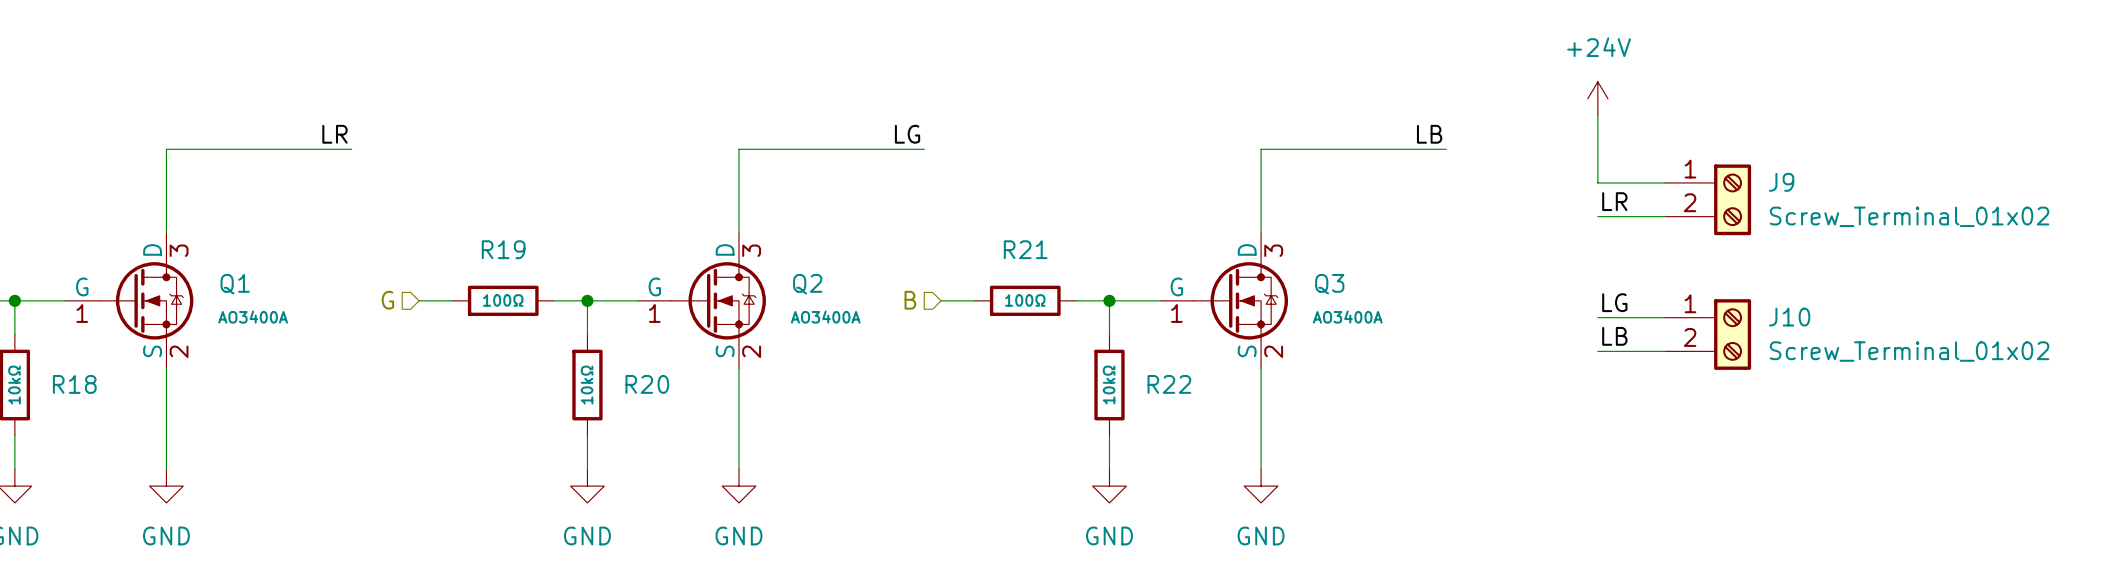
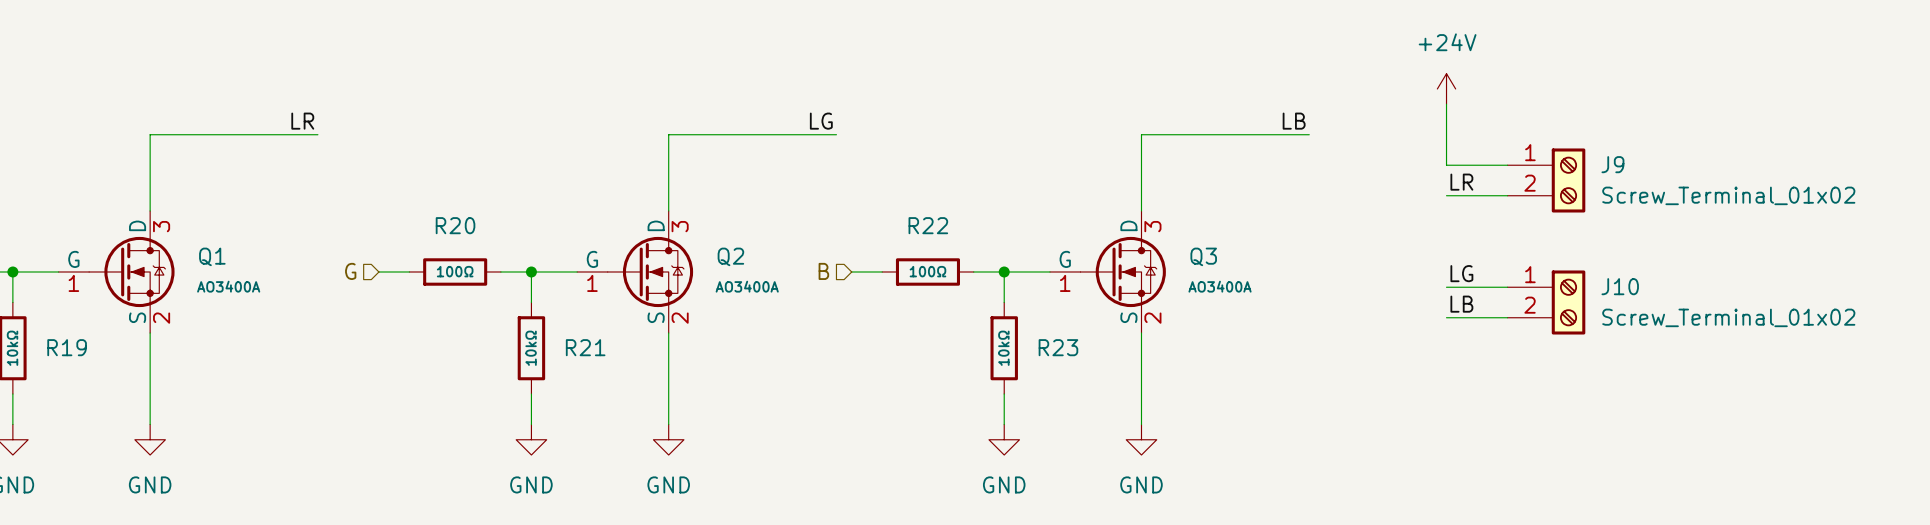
R19 name: R19 (503, 249) -> R20 (455, 225)
R21 name: R21 (1025, 249) -> R22 (928, 225)
R18 name: R18 (74, 384) -> R19 (67, 347)
R20 name: R20 (647, 384) -> R21 (585, 347)
R22 name: R22 (1169, 384) -> R23 (1058, 347)

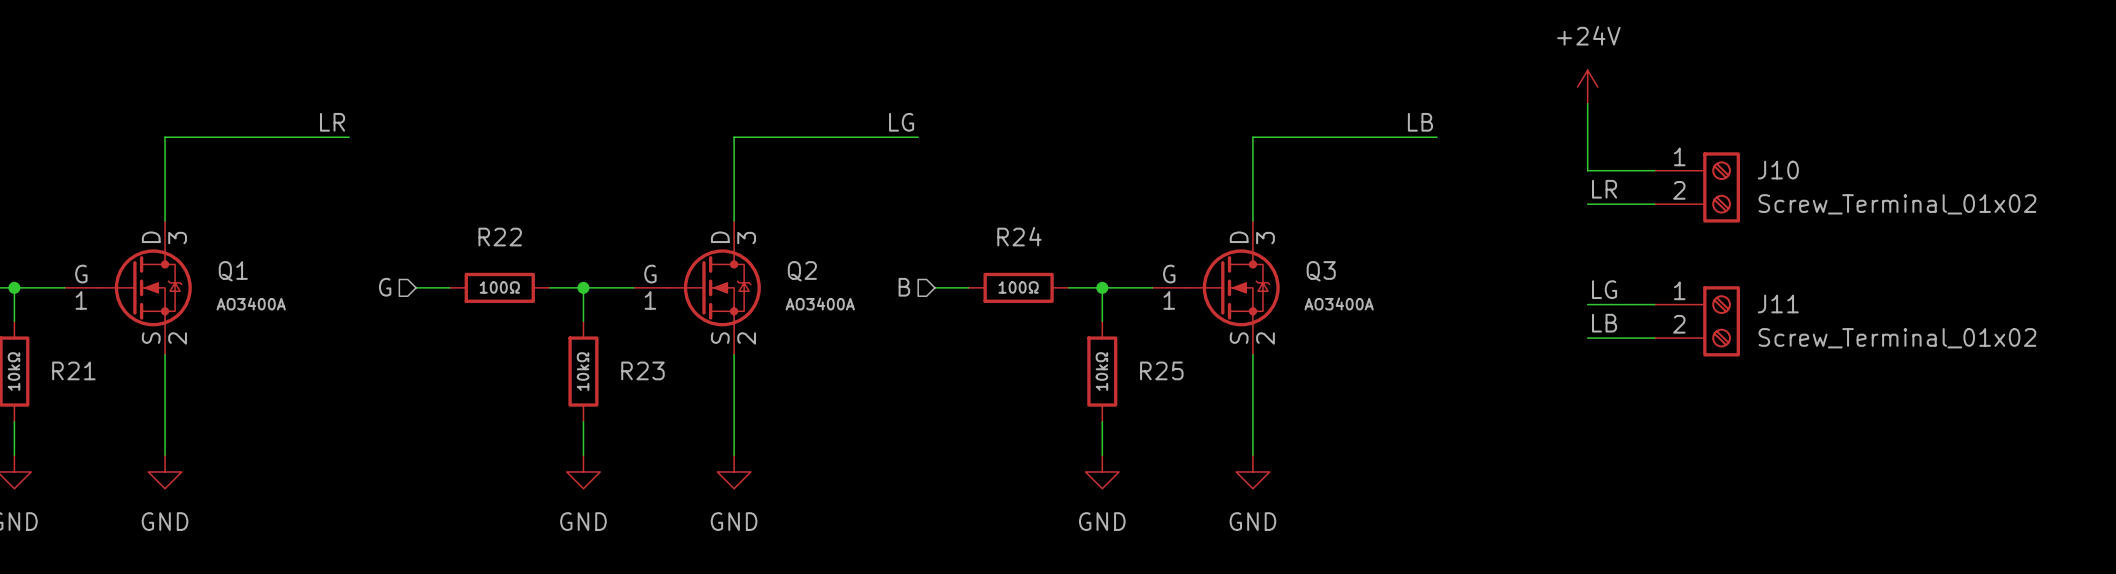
J9 name: J9 (1612, 164) -> J10 (1778, 170)
R20 name: R20 (455, 225) -> R22 (500, 237)
R22 name: R22 (928, 225) -> R24 (1019, 236)
J10 name: J10 (1620, 286) -> J11 (1778, 303)
R19 name: R19 (67, 347) -> R21 (73, 370)
R21 name: R21 (585, 347) -> R23 (642, 370)
R23 name: R23 (1058, 347) -> R25 (1161, 370)

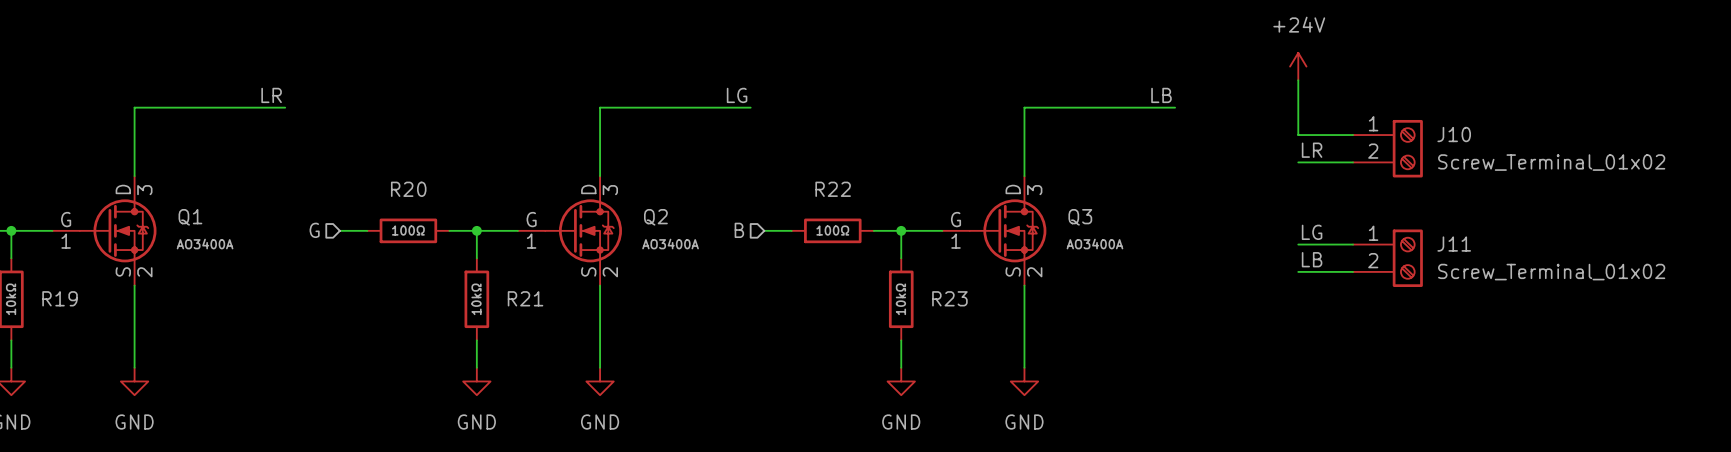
R24 name: R24 (1019, 236) -> R22 (833, 189)
R22 name: R22 (500, 237) -> R20 (408, 189)
R21 name: R21 (73, 370) -> R19 (60, 298)
R23 name: R23 (642, 370) -> R21 (525, 298)
R25 name: R25 (1161, 370) -> R23 (949, 298)

